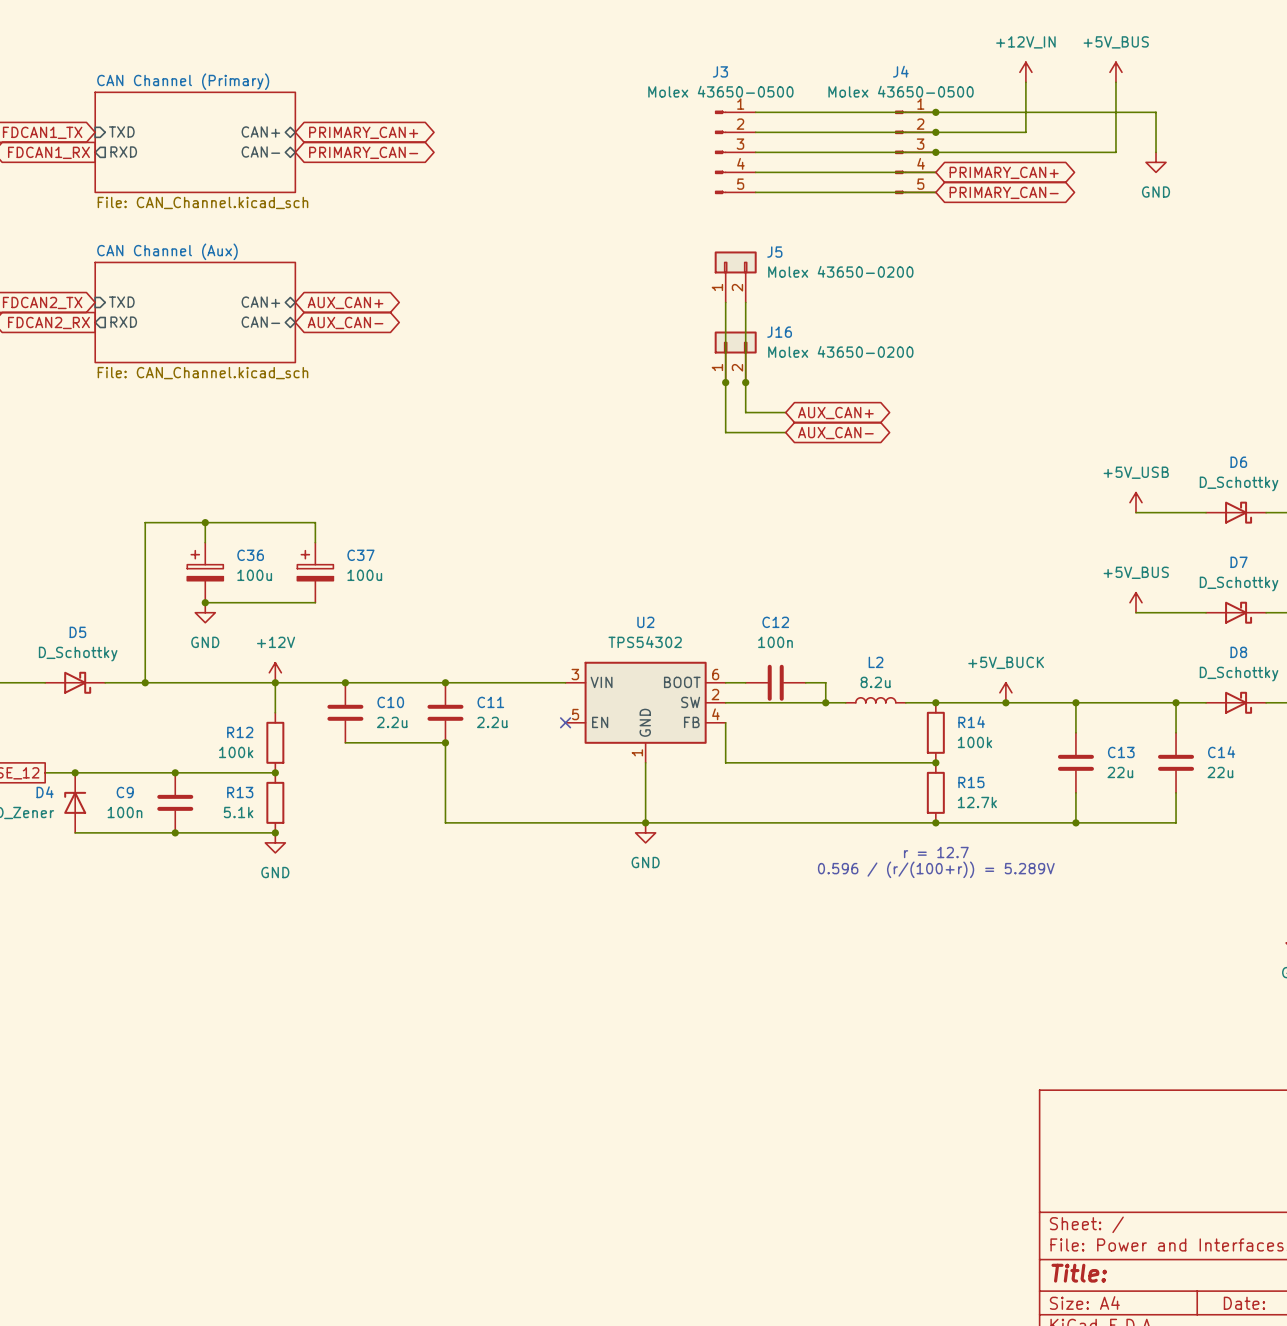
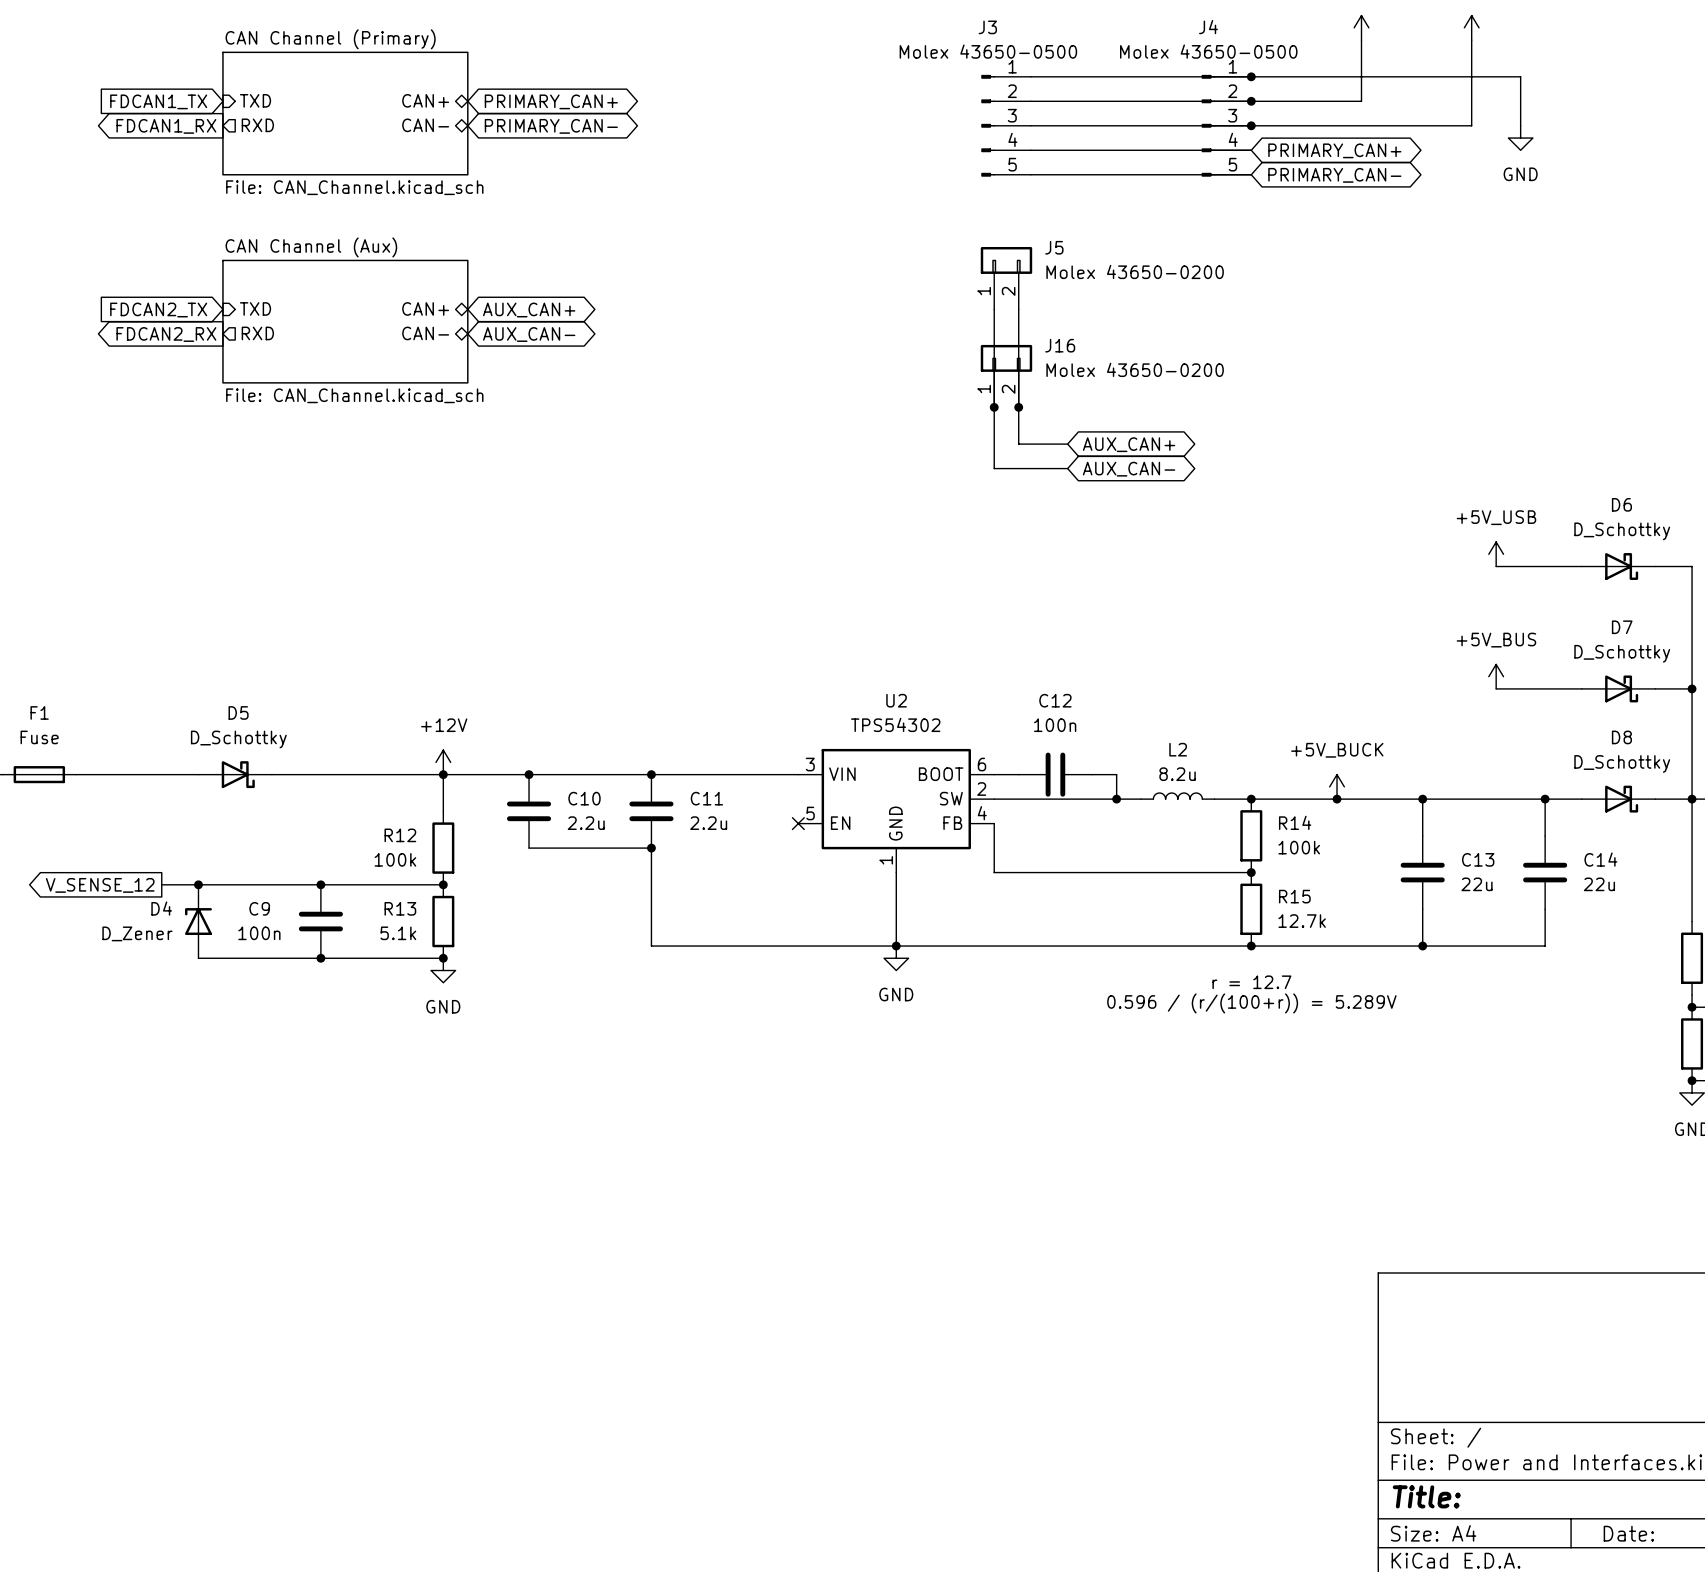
wire: (205, 522) (205, 542) -> none
junction: (205, 522) -> none
wire: (315, 542) (315, 522) (145, 522) (145, 682) -> none
C36: 100u (205, 572) -> none
C37: 100u (315, 572) -> none
wire: (205, 602) (315, 602) -> none
junction: (205, 602) -> none
power symbol: GND (205, 612) -> none
D5 position: (75, 682) -> (235, 774)
junction: (145, 682) -> none

